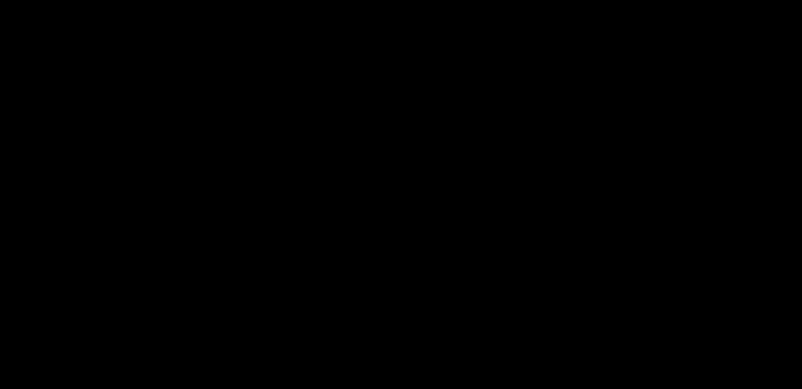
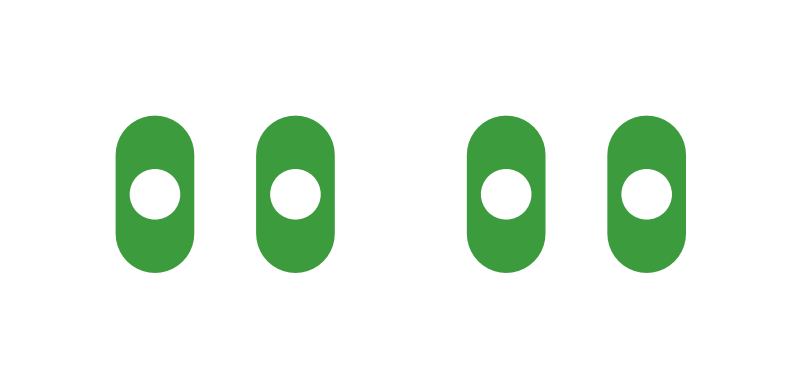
part: none -> (225, 194)
part: none -> (576, 194)

